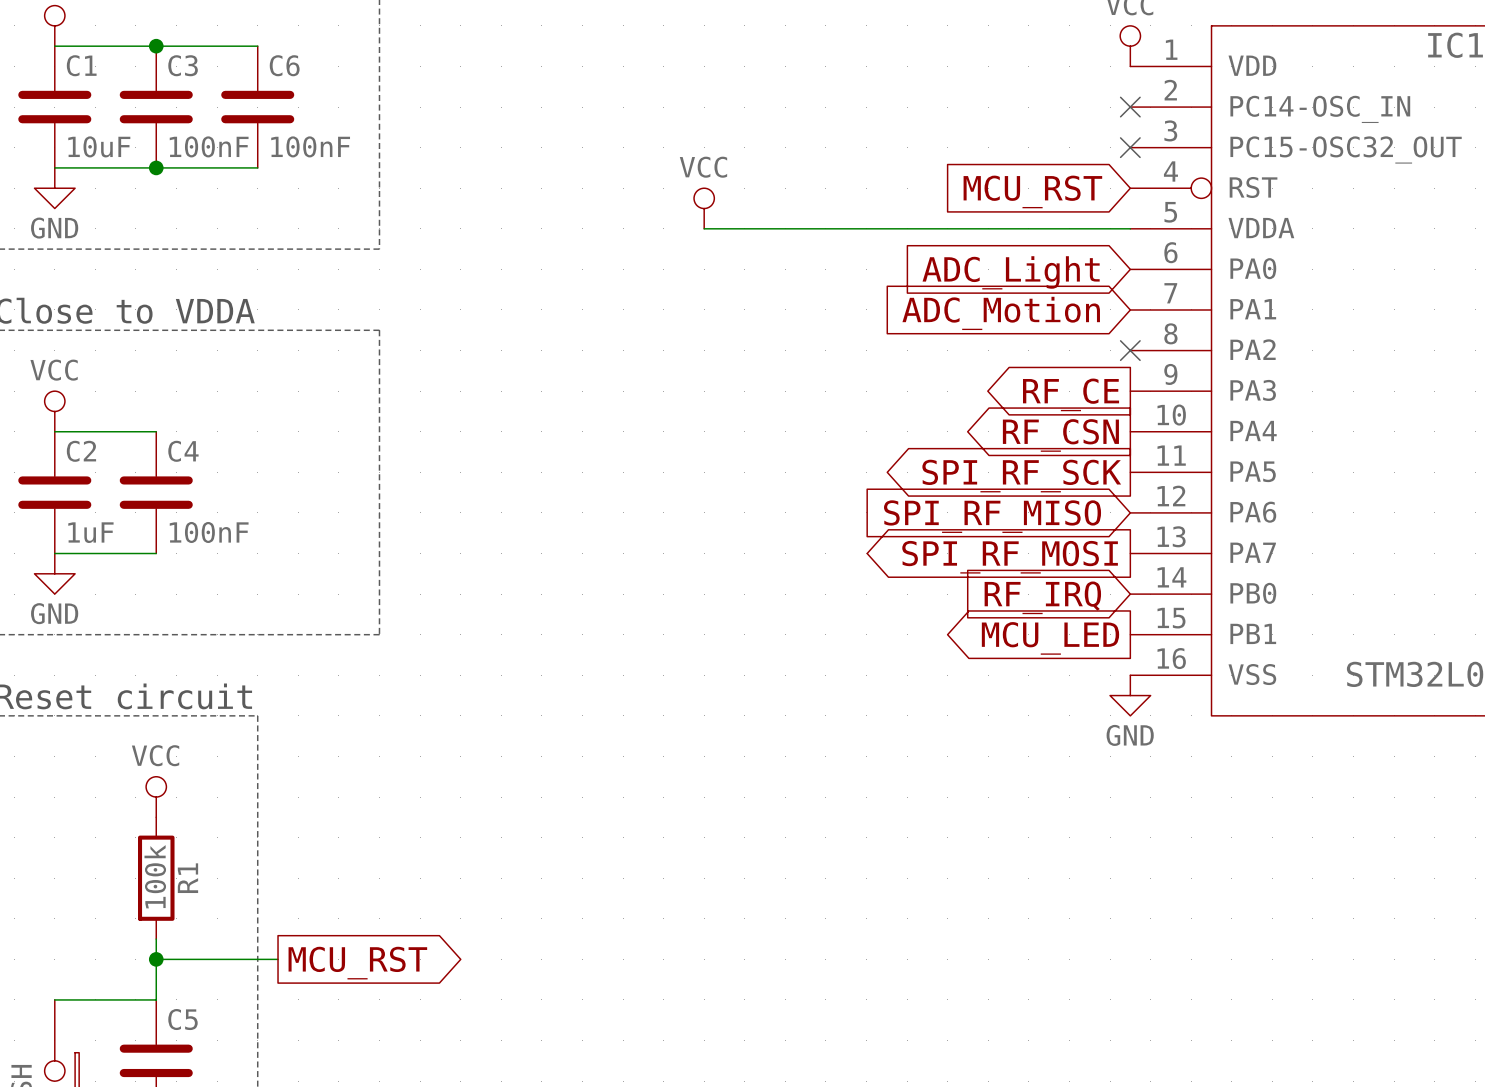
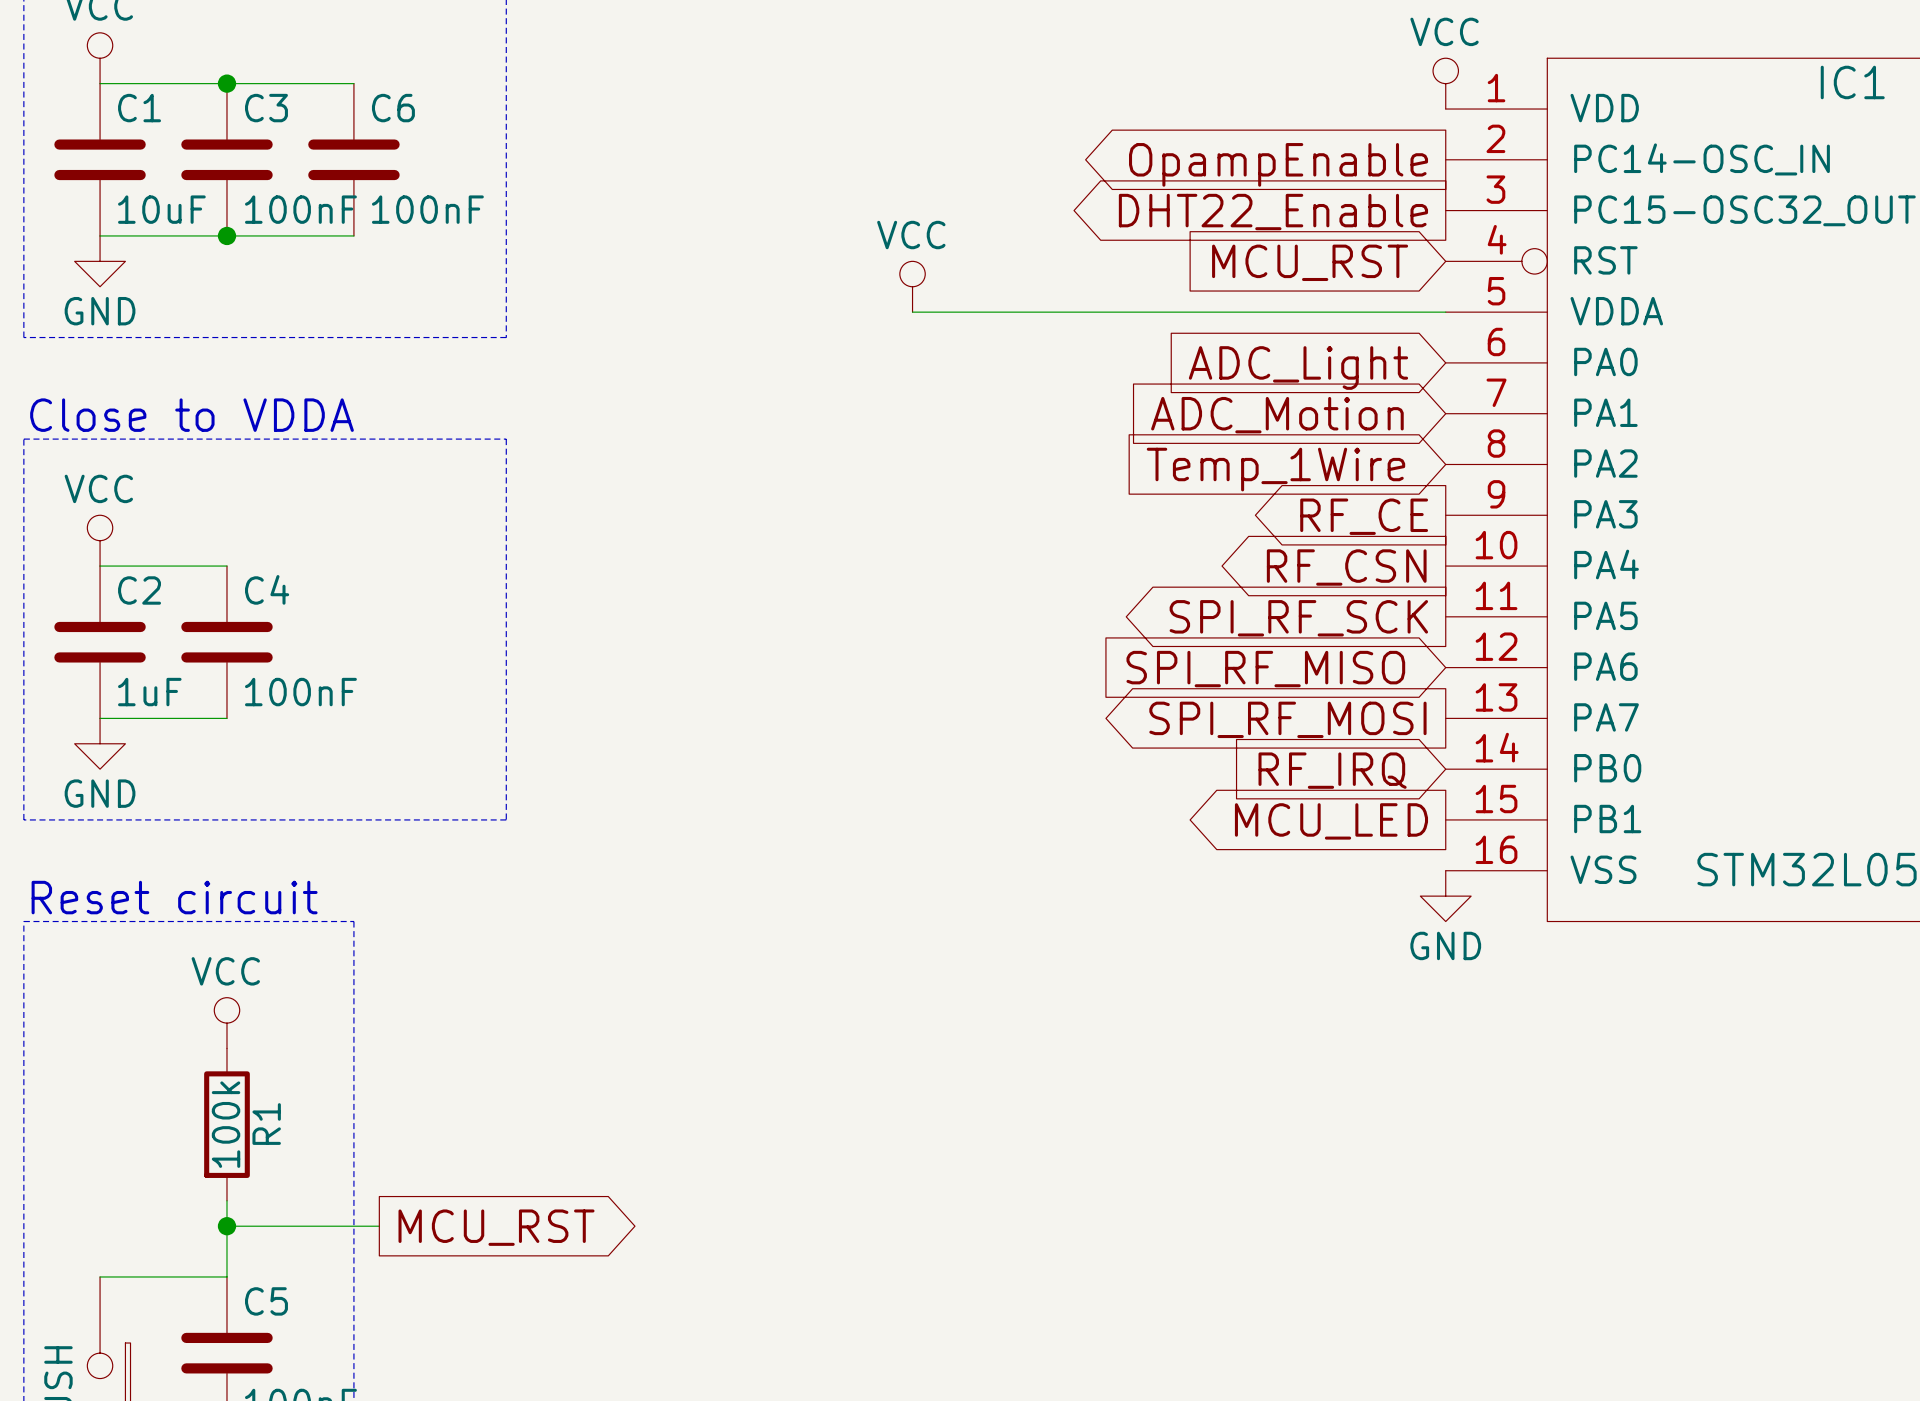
no-connect mark: (1130, 107) -> none
global label: none -> OpampEnable (1278, 164)
no-connect mark: (1130, 147) -> none
global label: none -> DHT22_Enable (1273, 212)
no-connect mark: (1130, 350) -> none
global label: none -> Temp_1Wire (1275, 469)

